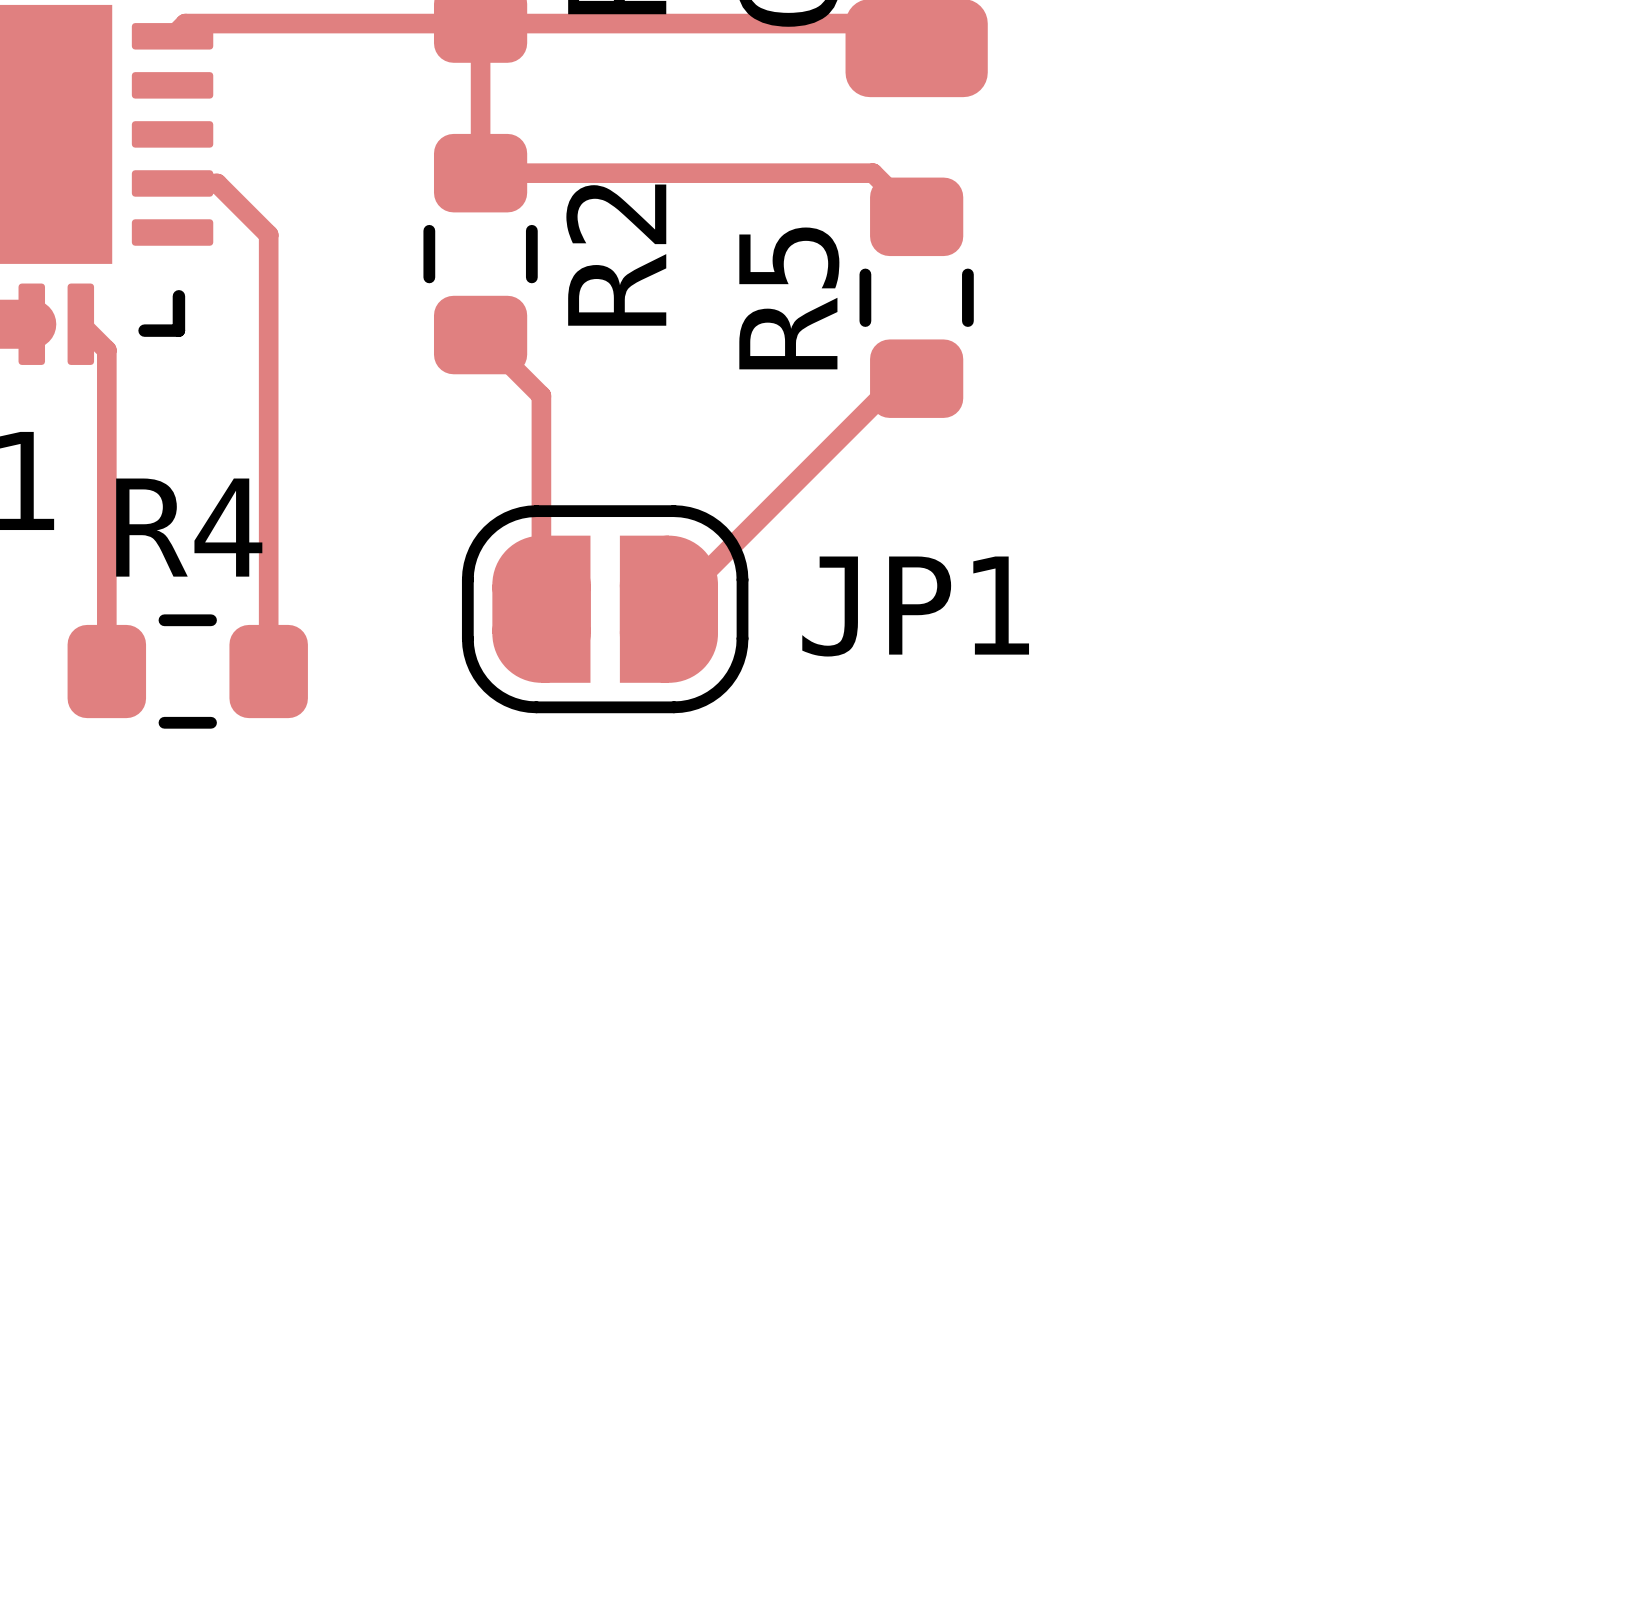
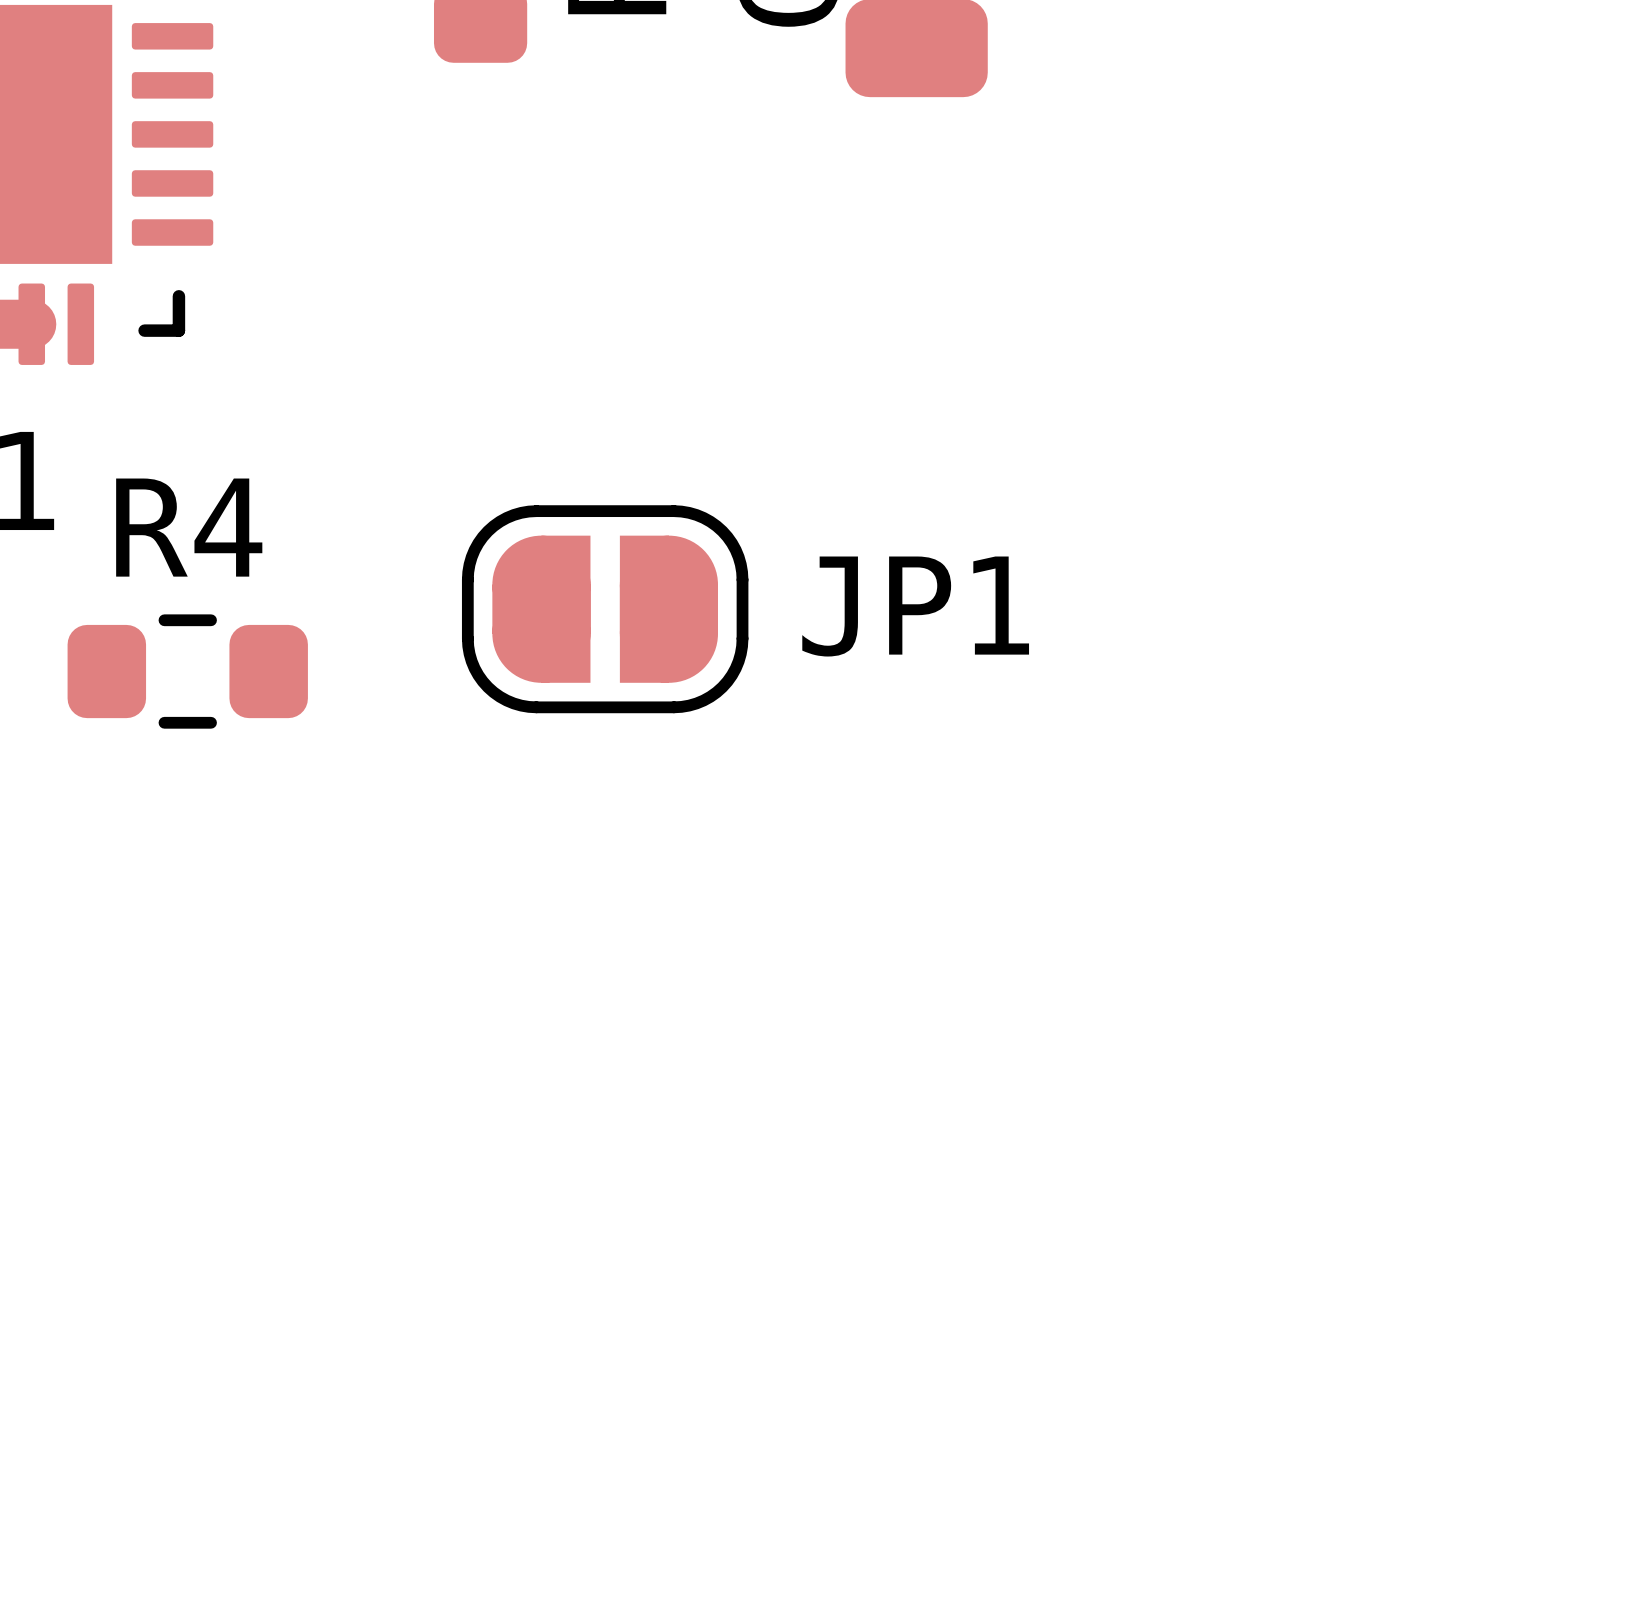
top track: (480, 23) (480, 173) (872, 173) (916, 216) -> none
top track: (172, 36) (185, 23) (892, 23) (916, 48) -> none
top track: (172, 183) (217, 183) (268, 234) (268, 671) -> none
R2: (480, 254) -> none
R5: (916, 297) -> none
top track: (80, 324) (106, 350) (106, 671) -> none
top track: (480, 335) (541, 395) (541, 609) -> none
top track: (916, 378) (899, 378) (668, 609) -> none

